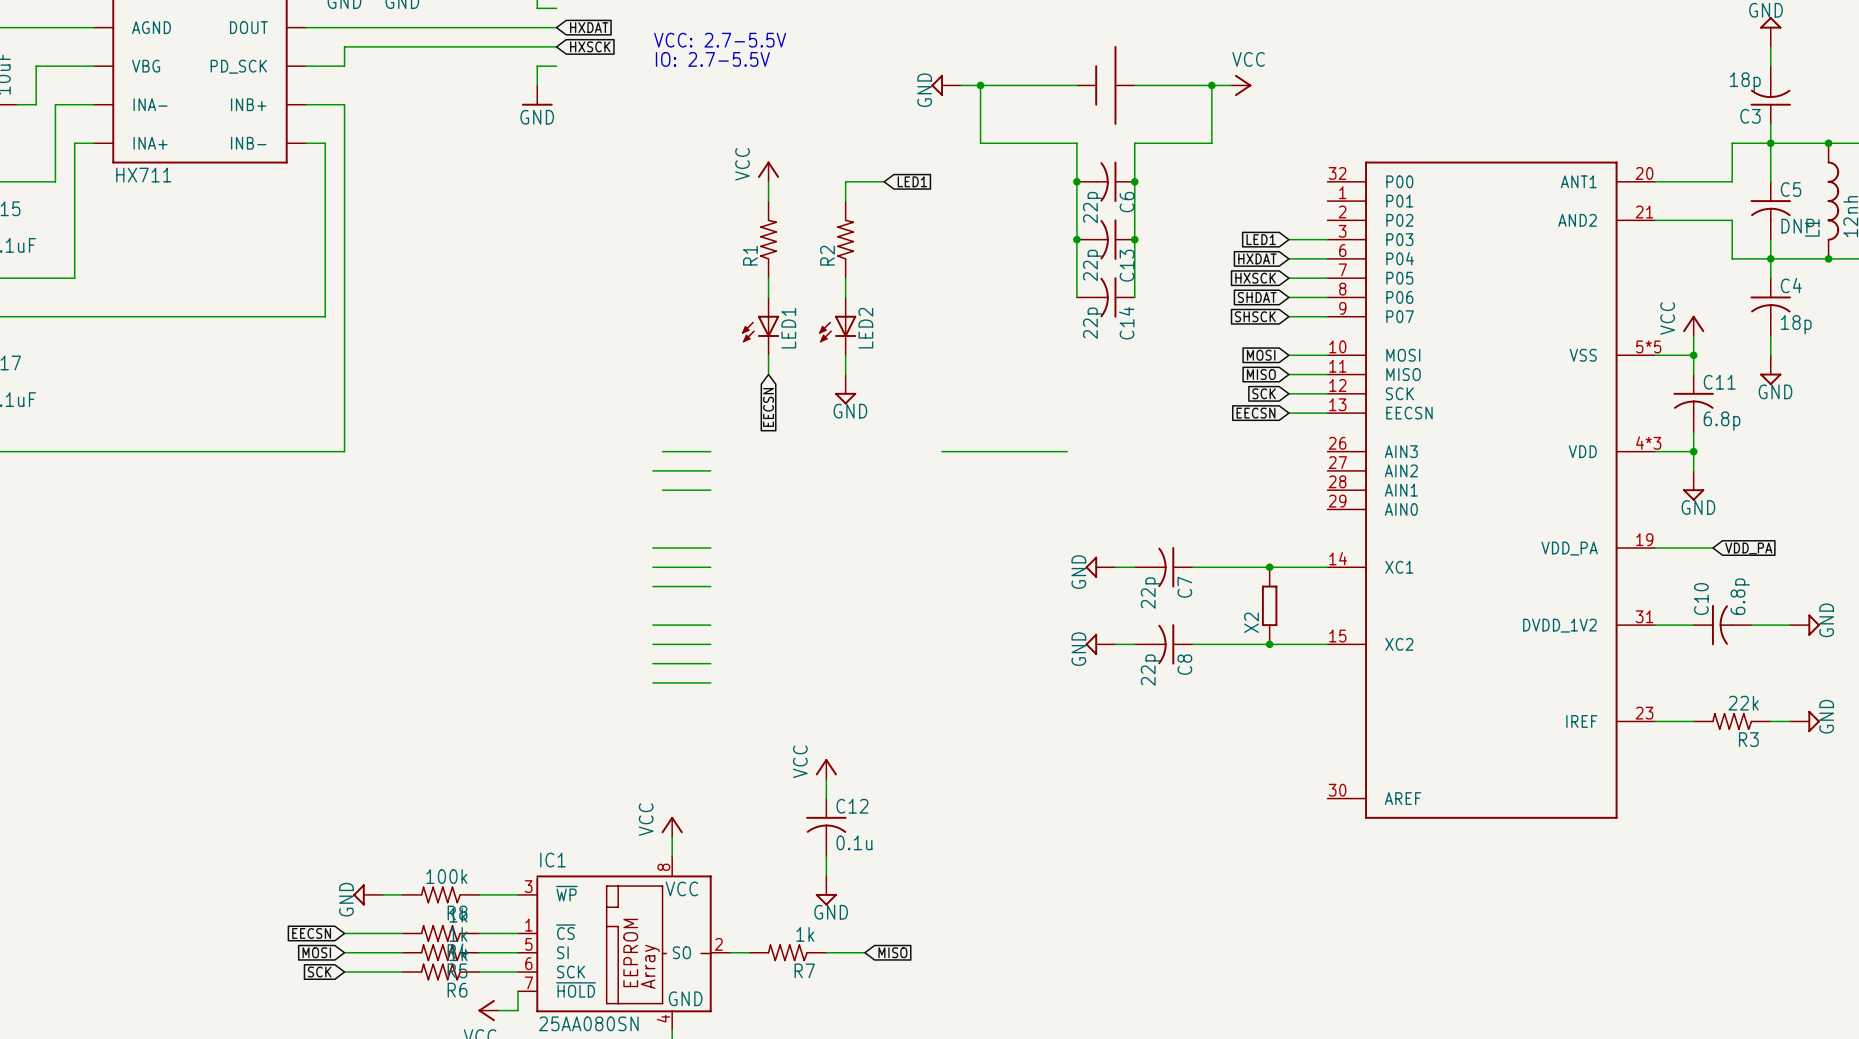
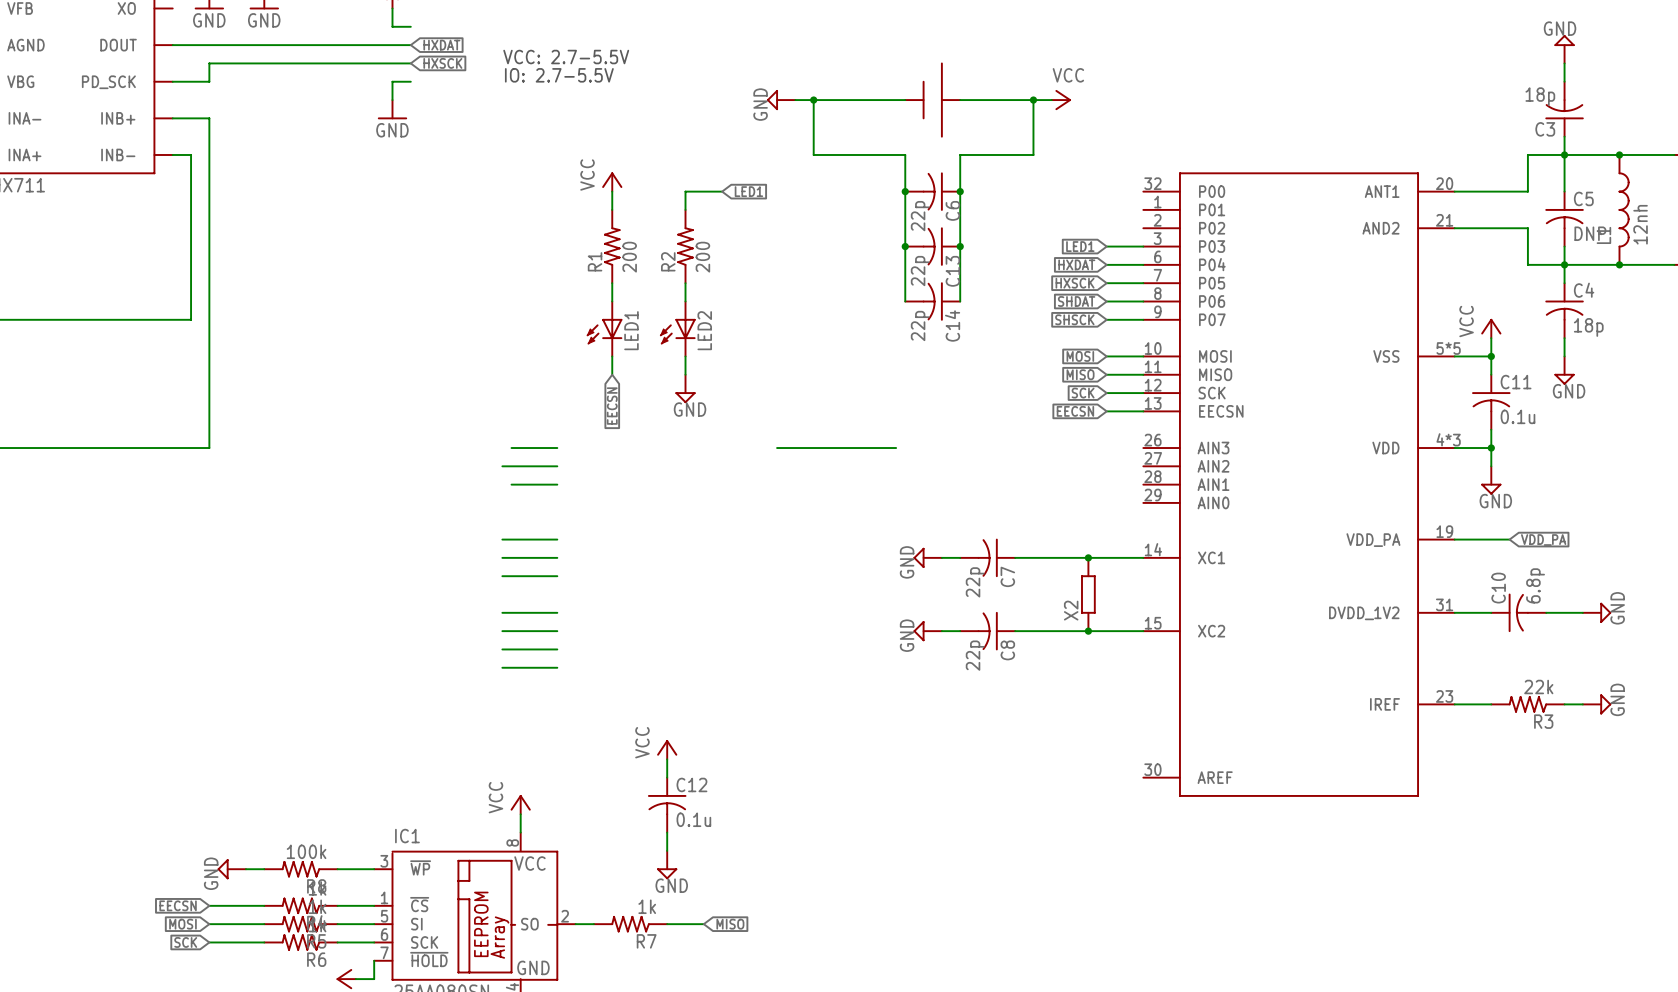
R1 value: none -> 200 (629, 257)
R2 value: none -> 200 (702, 257)
C11 value: 6.8p (1722, 421) -> 0.1u (1517, 416)

